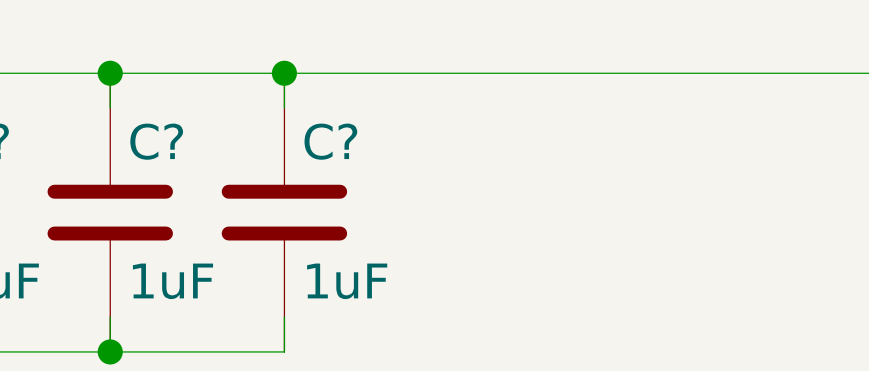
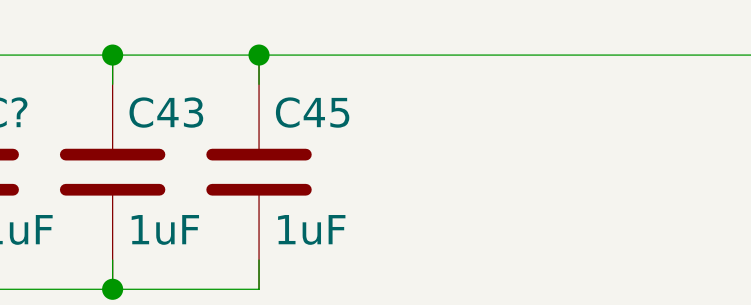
C? name: C? (156, 141) -> C43 (166, 112)
C? name: C? (330, 141) -> C45 (312, 112)

